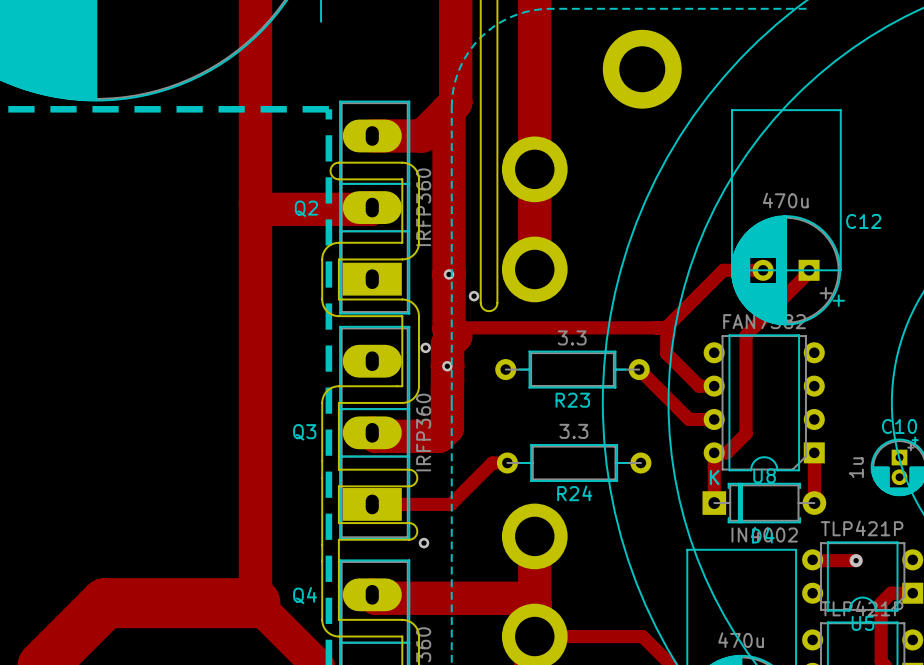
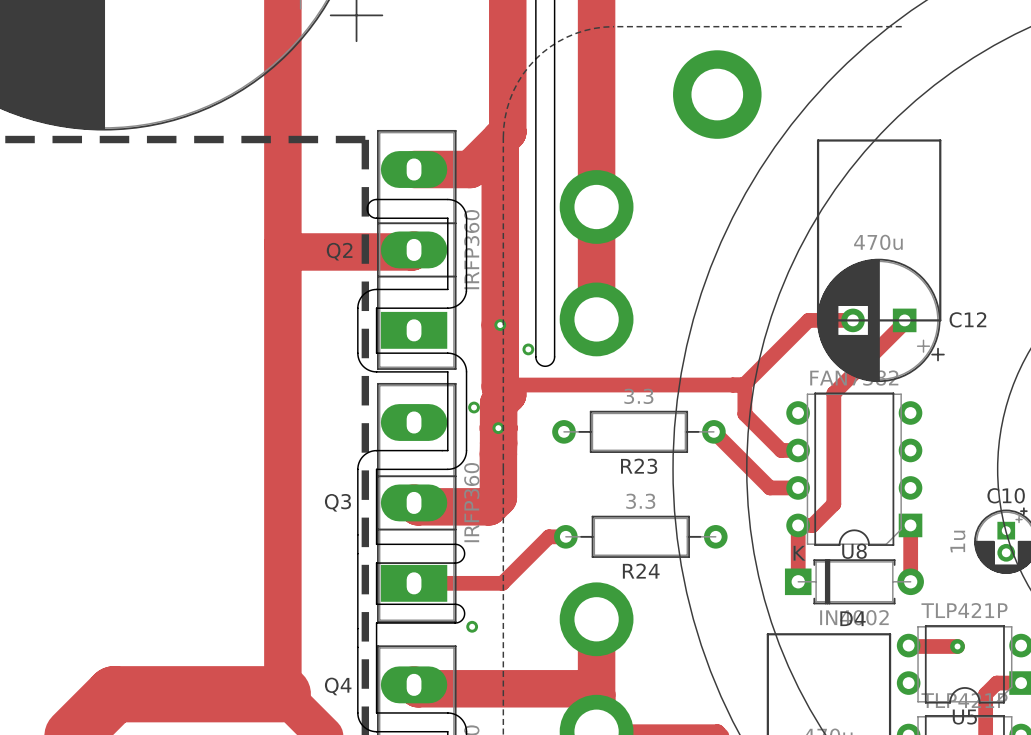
C12 name position: C12 (863, 221) -> C12 (967, 319)

